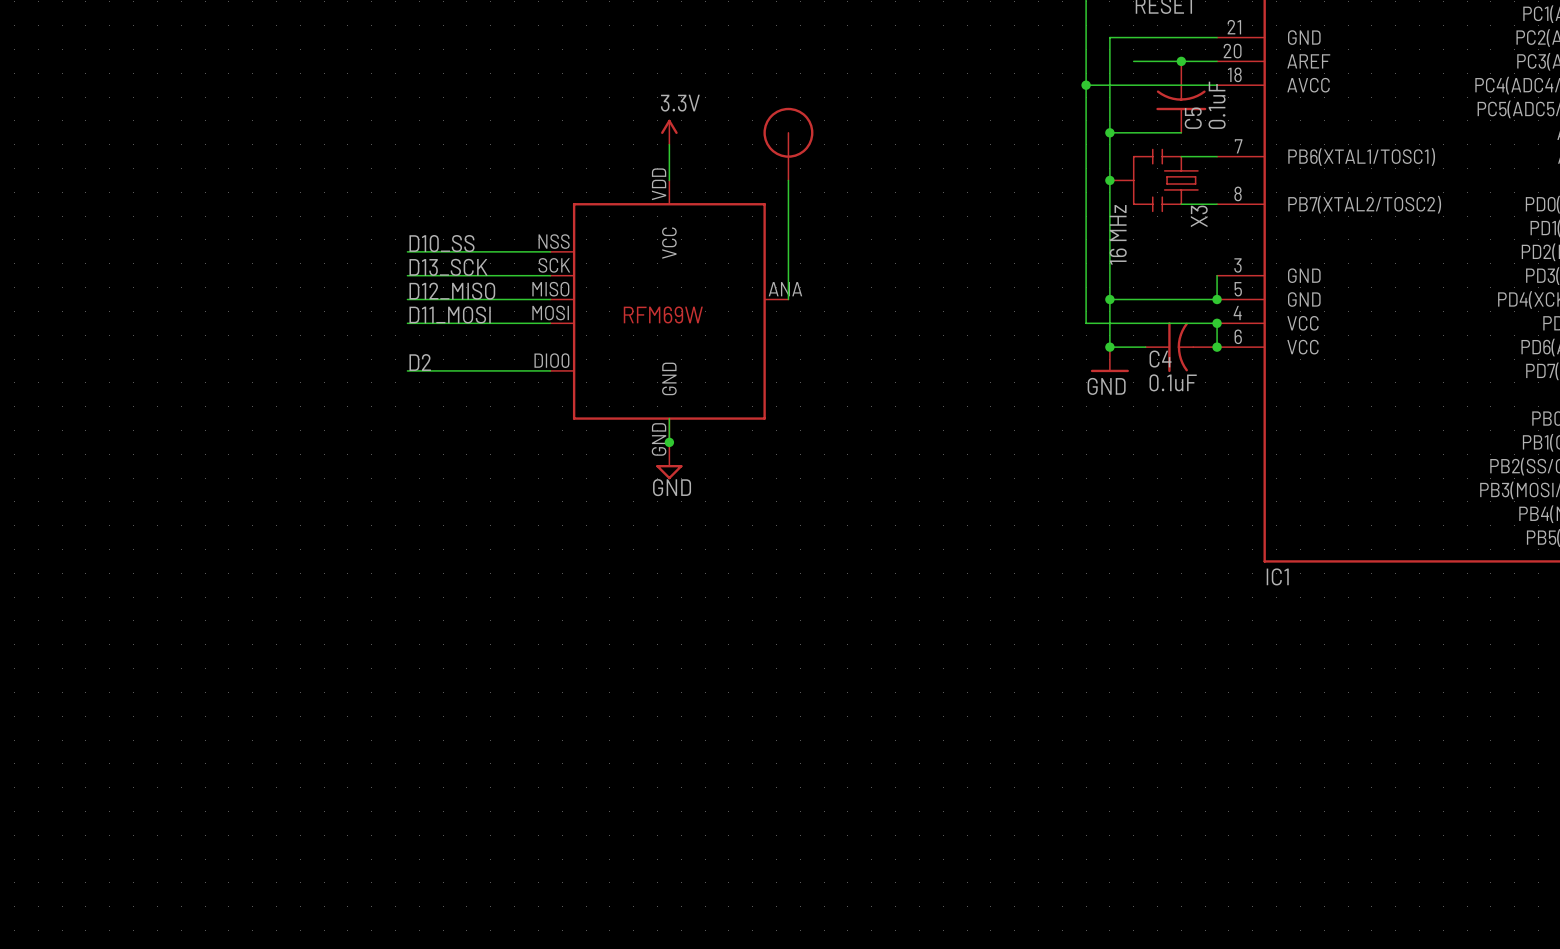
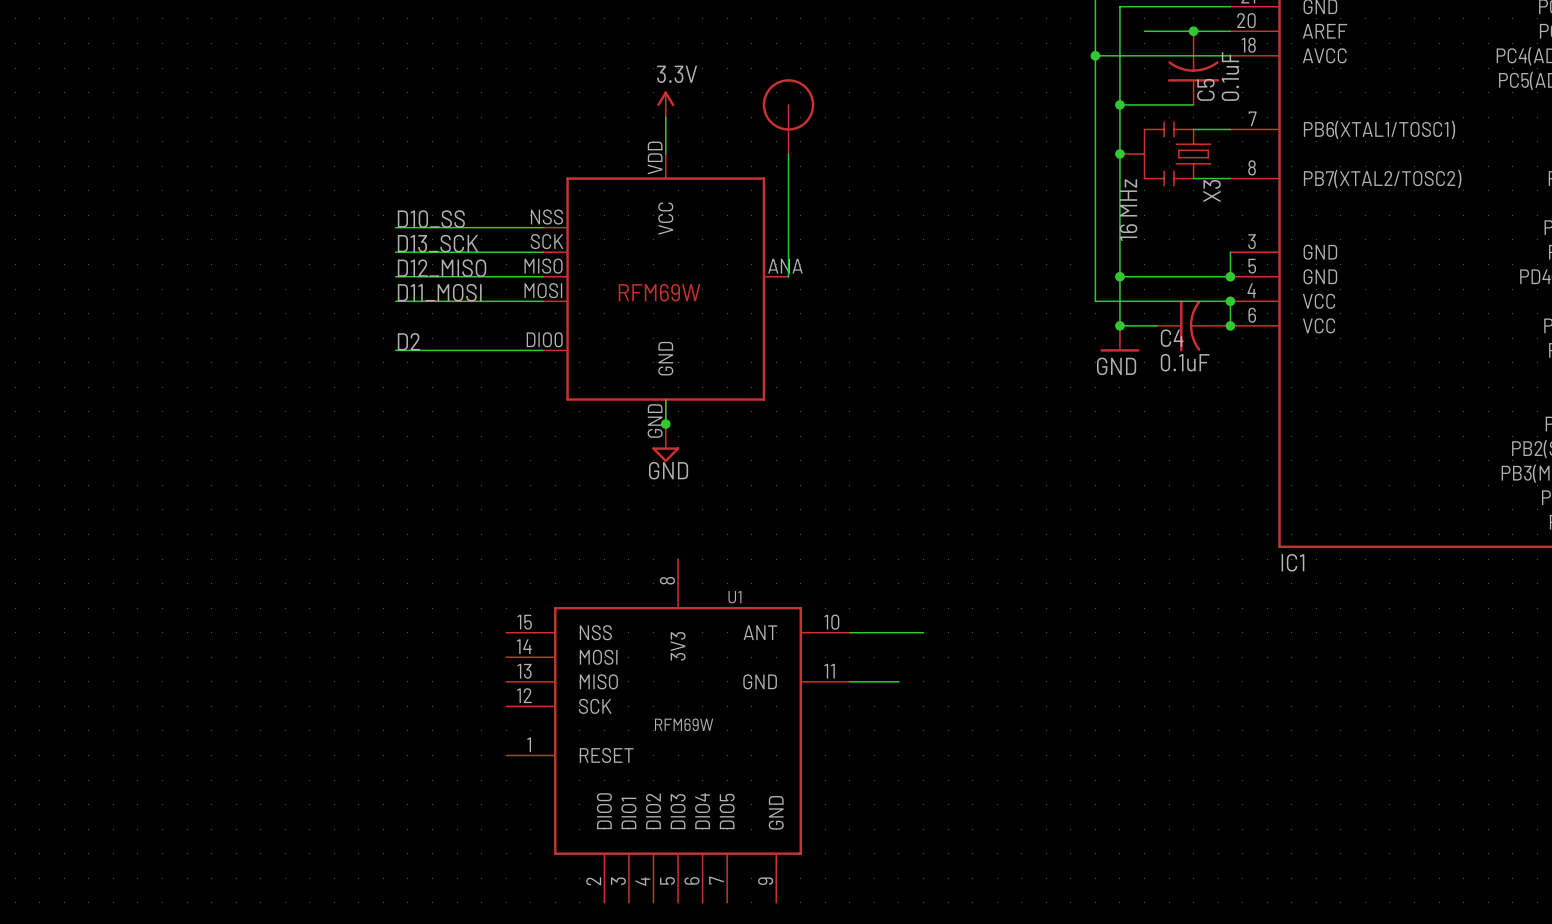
wire: none -> (849, 632) (923, 632)
wire: none -> (849, 681) (898, 681)
U1: none -> RFM69W (678, 730)

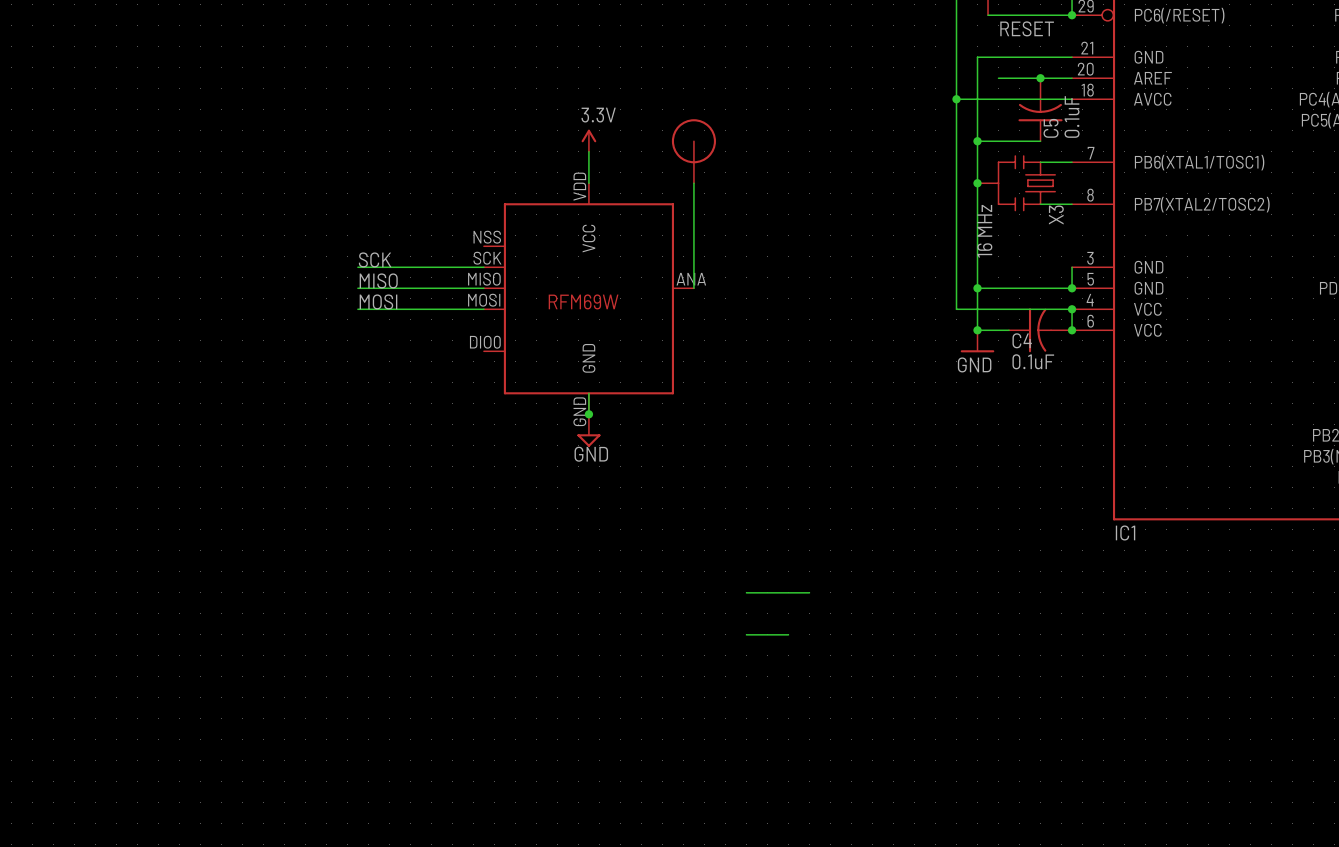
label: D10_SS (431, 219) -> none
wire: (395, 227) (543, 227) -> none
label: D13_SCK (438, 243) -> SCK (375, 259)
label: D12_MISO (442, 268) -> MISO (378, 280)
label: D11_MOSI (439, 292) -> MOSI (378, 301)
label: D2 (408, 341) -> none
wire: (395, 350) (543, 350) -> none
U1: RFM69W (678, 730) -> none

